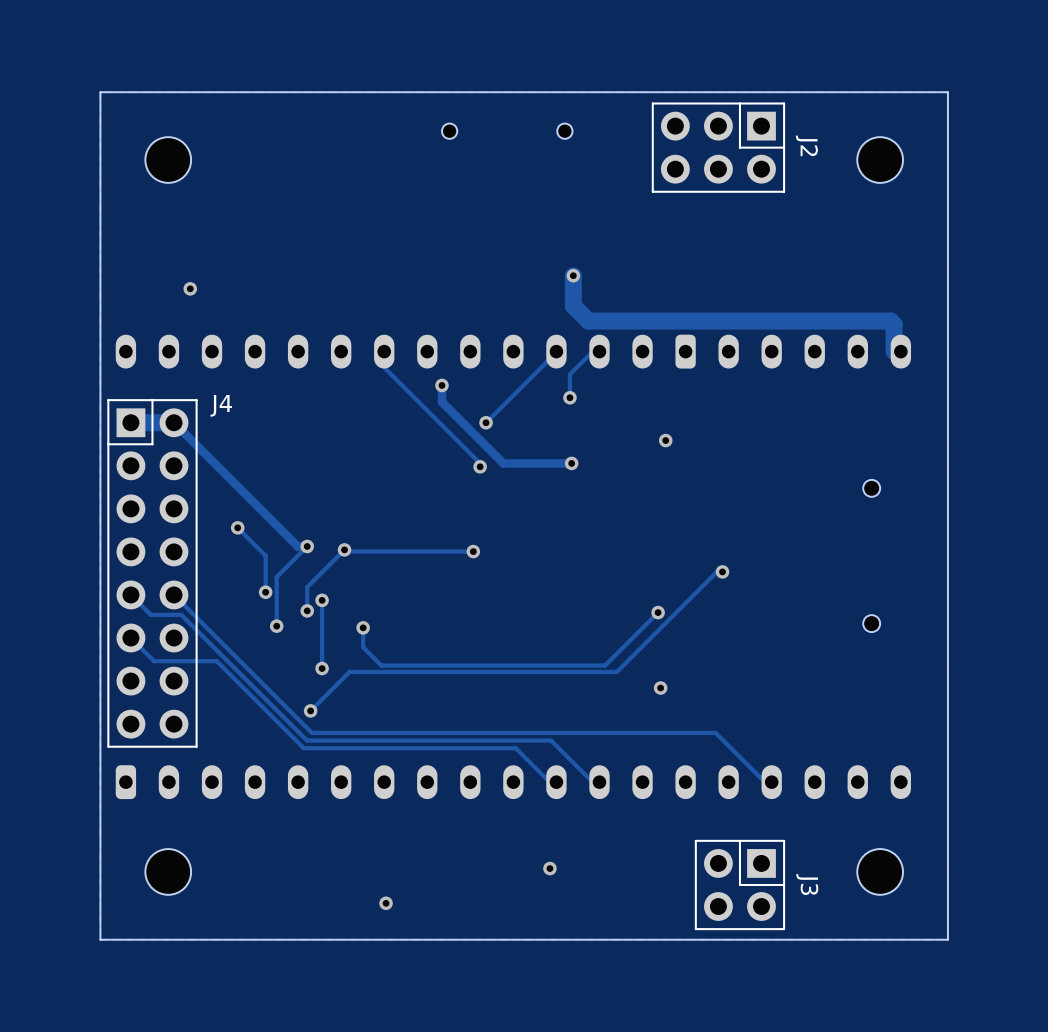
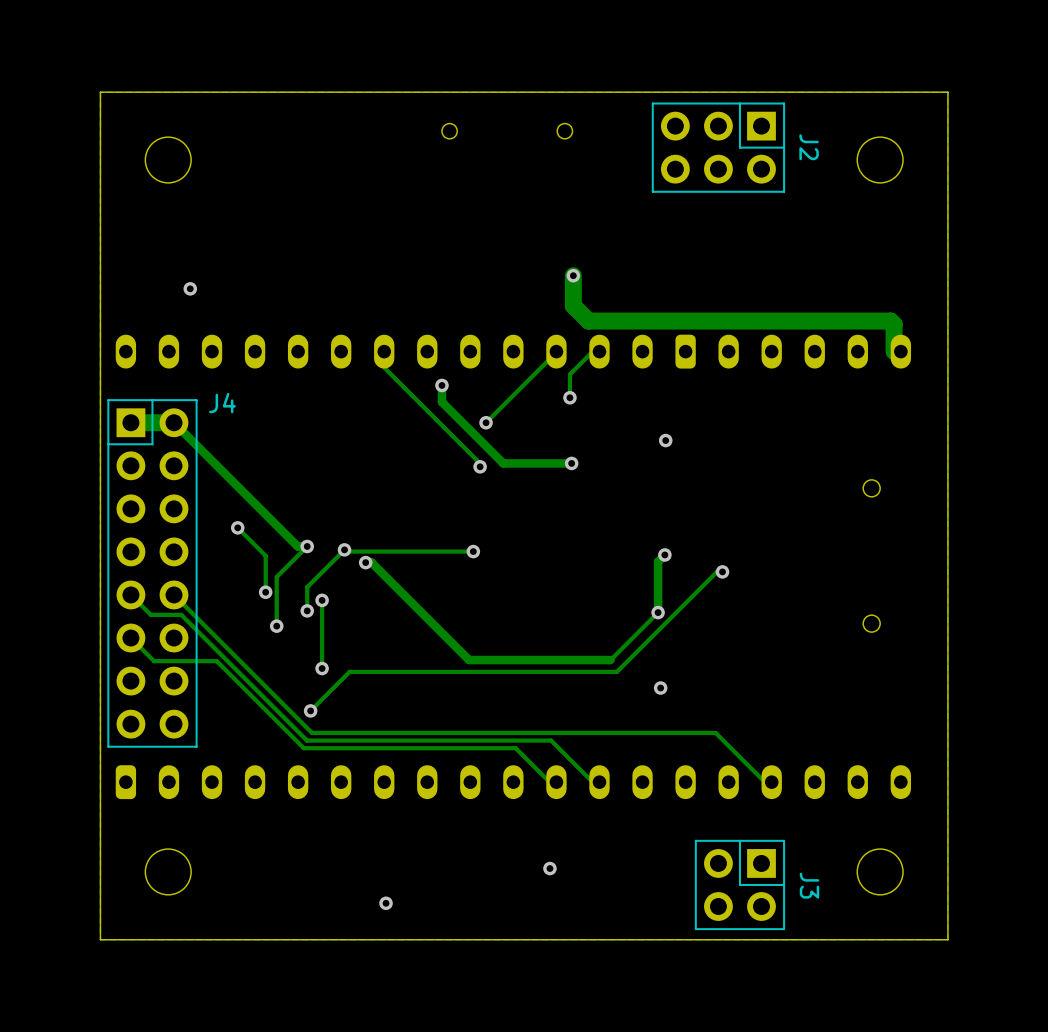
via: none -> (664, 554)
track: none -> (665, 554) (658, 561) (658, 612)
track: (363, 627) (363, 647) (381, 665) (605, 665) (610, 660) -> (365, 562) (371, 562) (469, 660) (610, 660)
via position: (363, 627) -> (365, 562)

